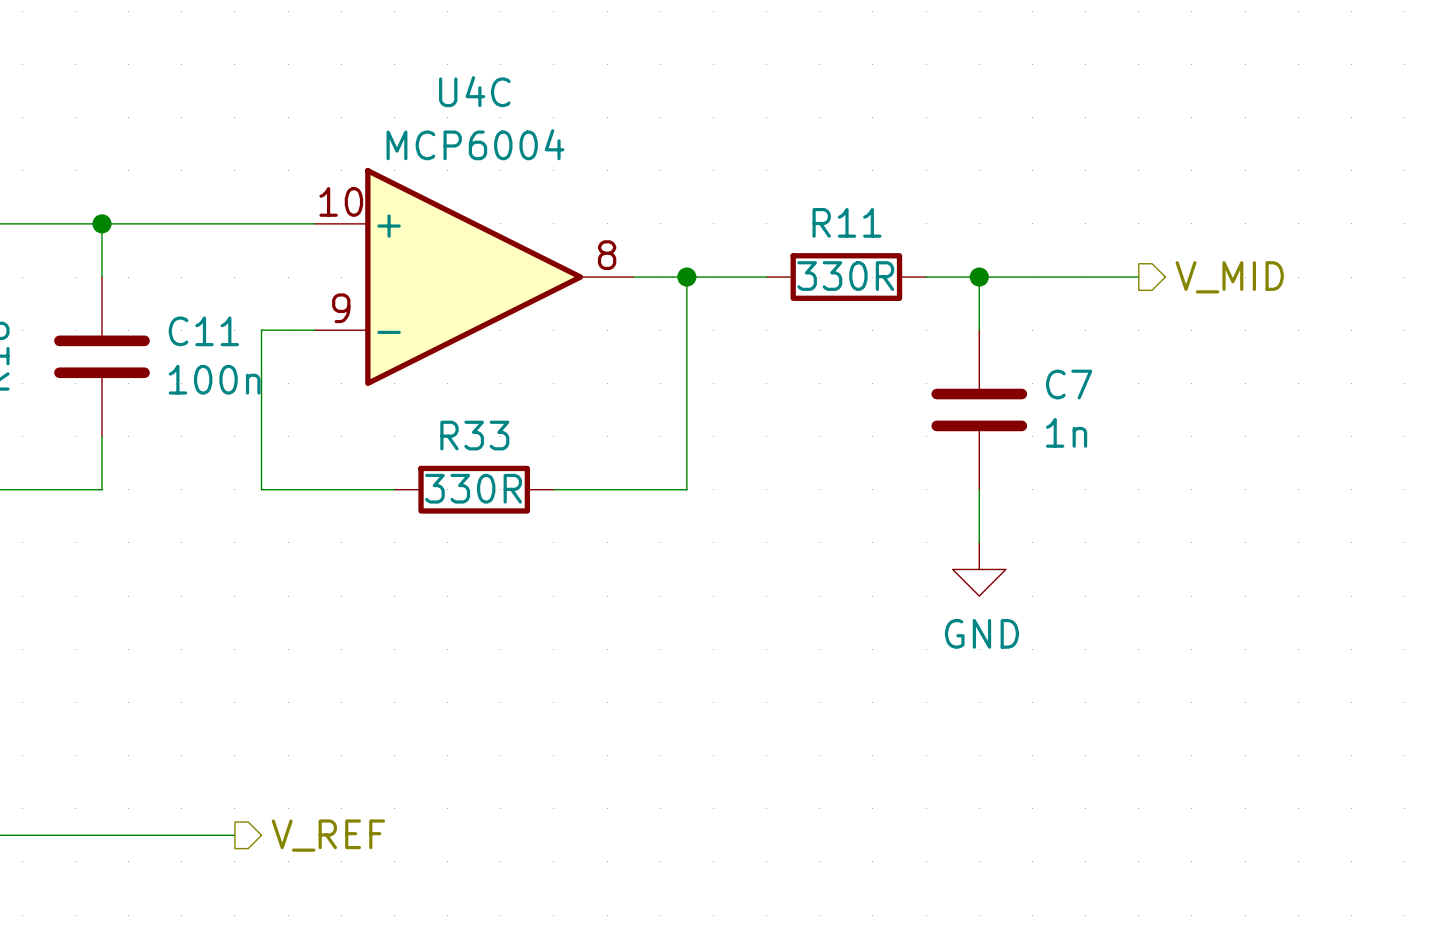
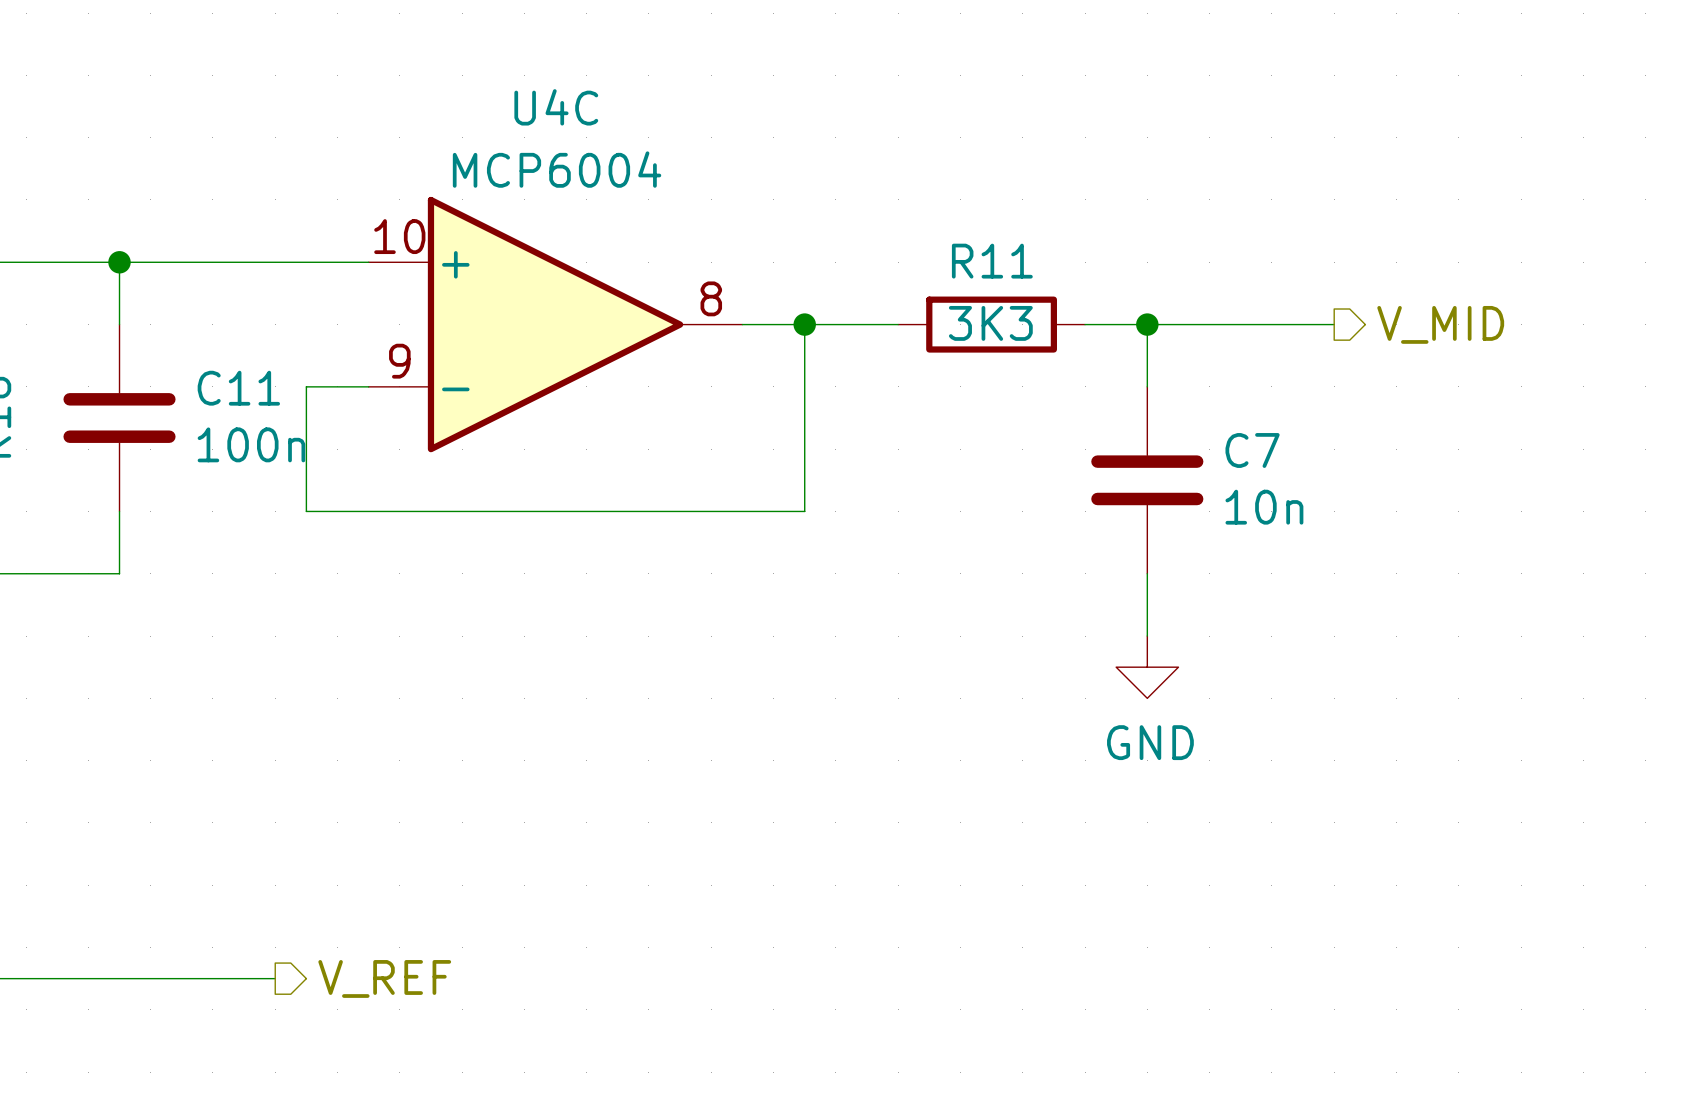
R11 value: 330R (845, 276) -> 3K3 (990, 323)
C7 value: 1n (1066, 432) -> 10n (1264, 507)
wire: (261, 436) (261, 489) (394, 489) -> (306, 511) (804, 511)
wire: (686, 436) (686, 489) (553, 489) -> none
R33: 330R (474, 489) -> none

